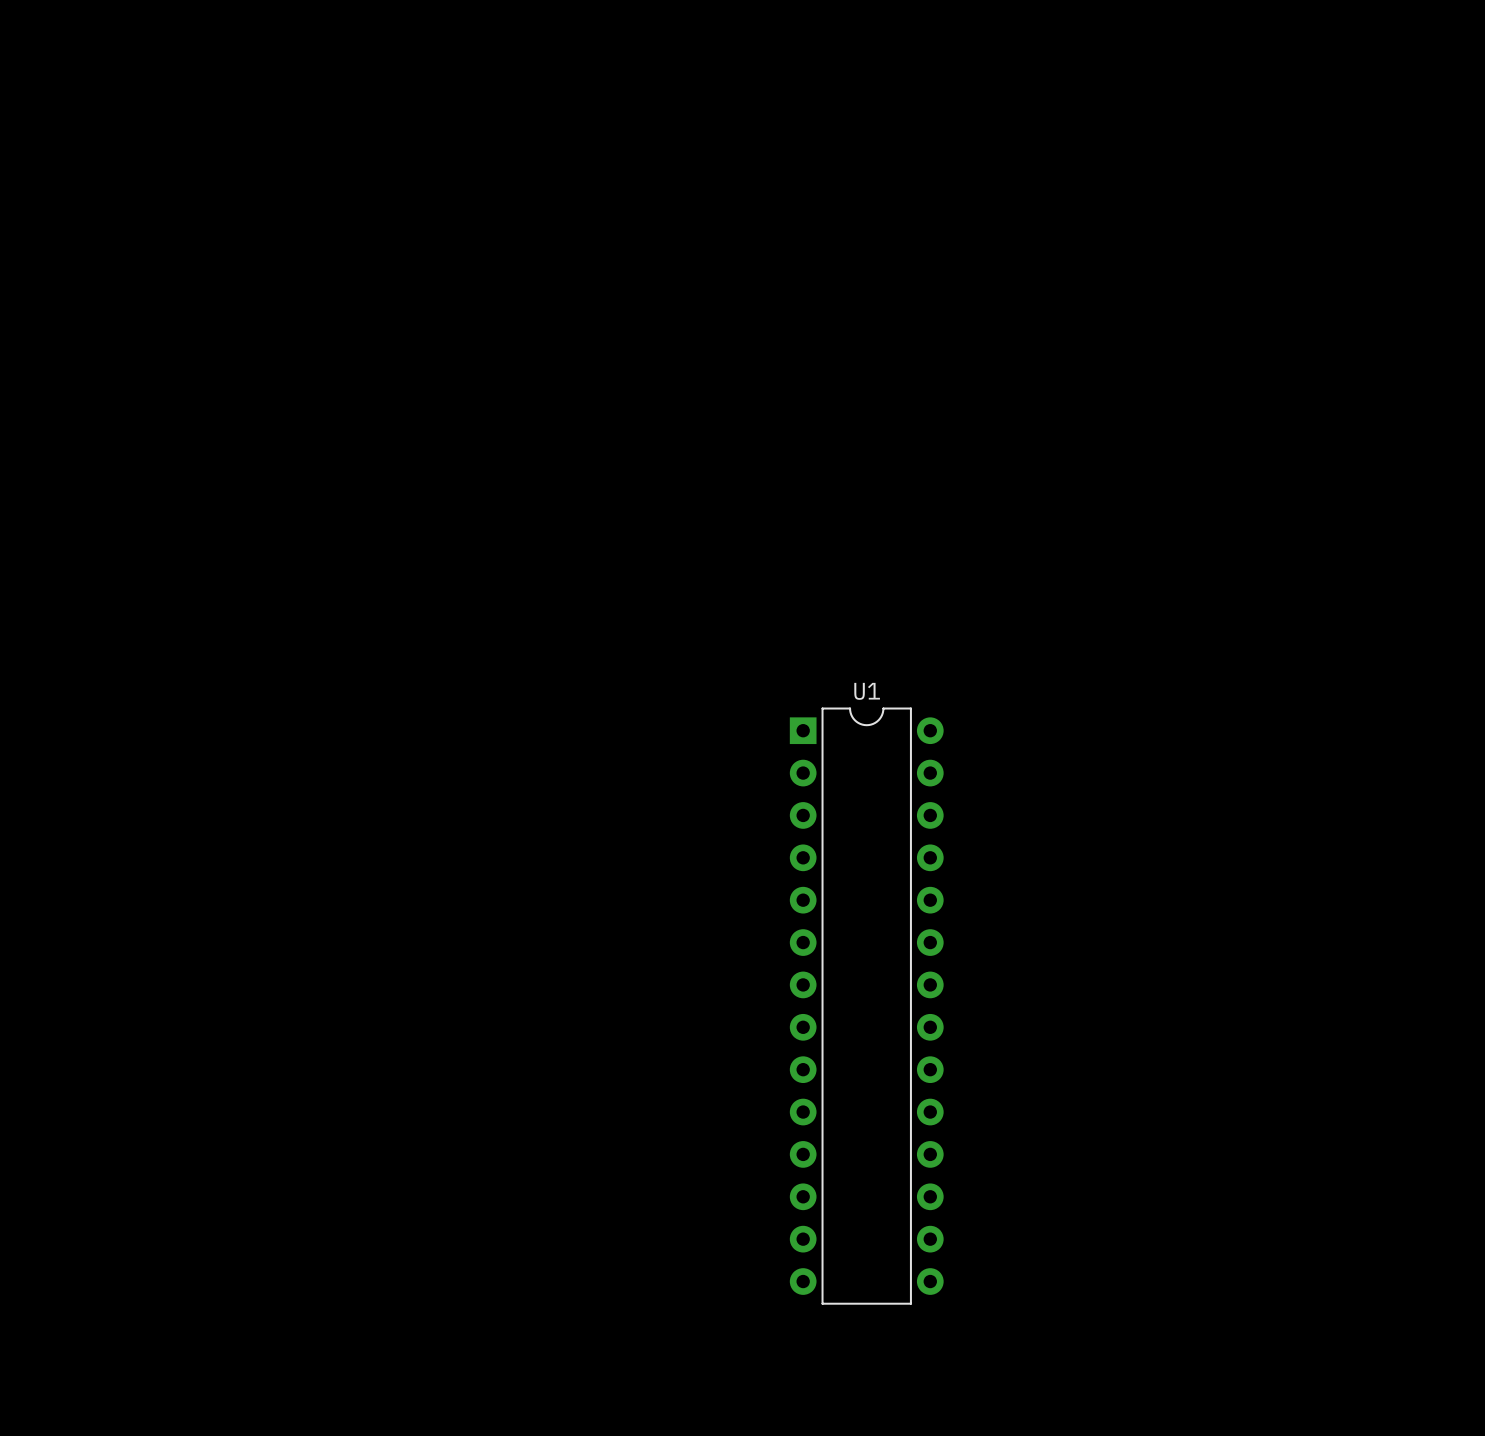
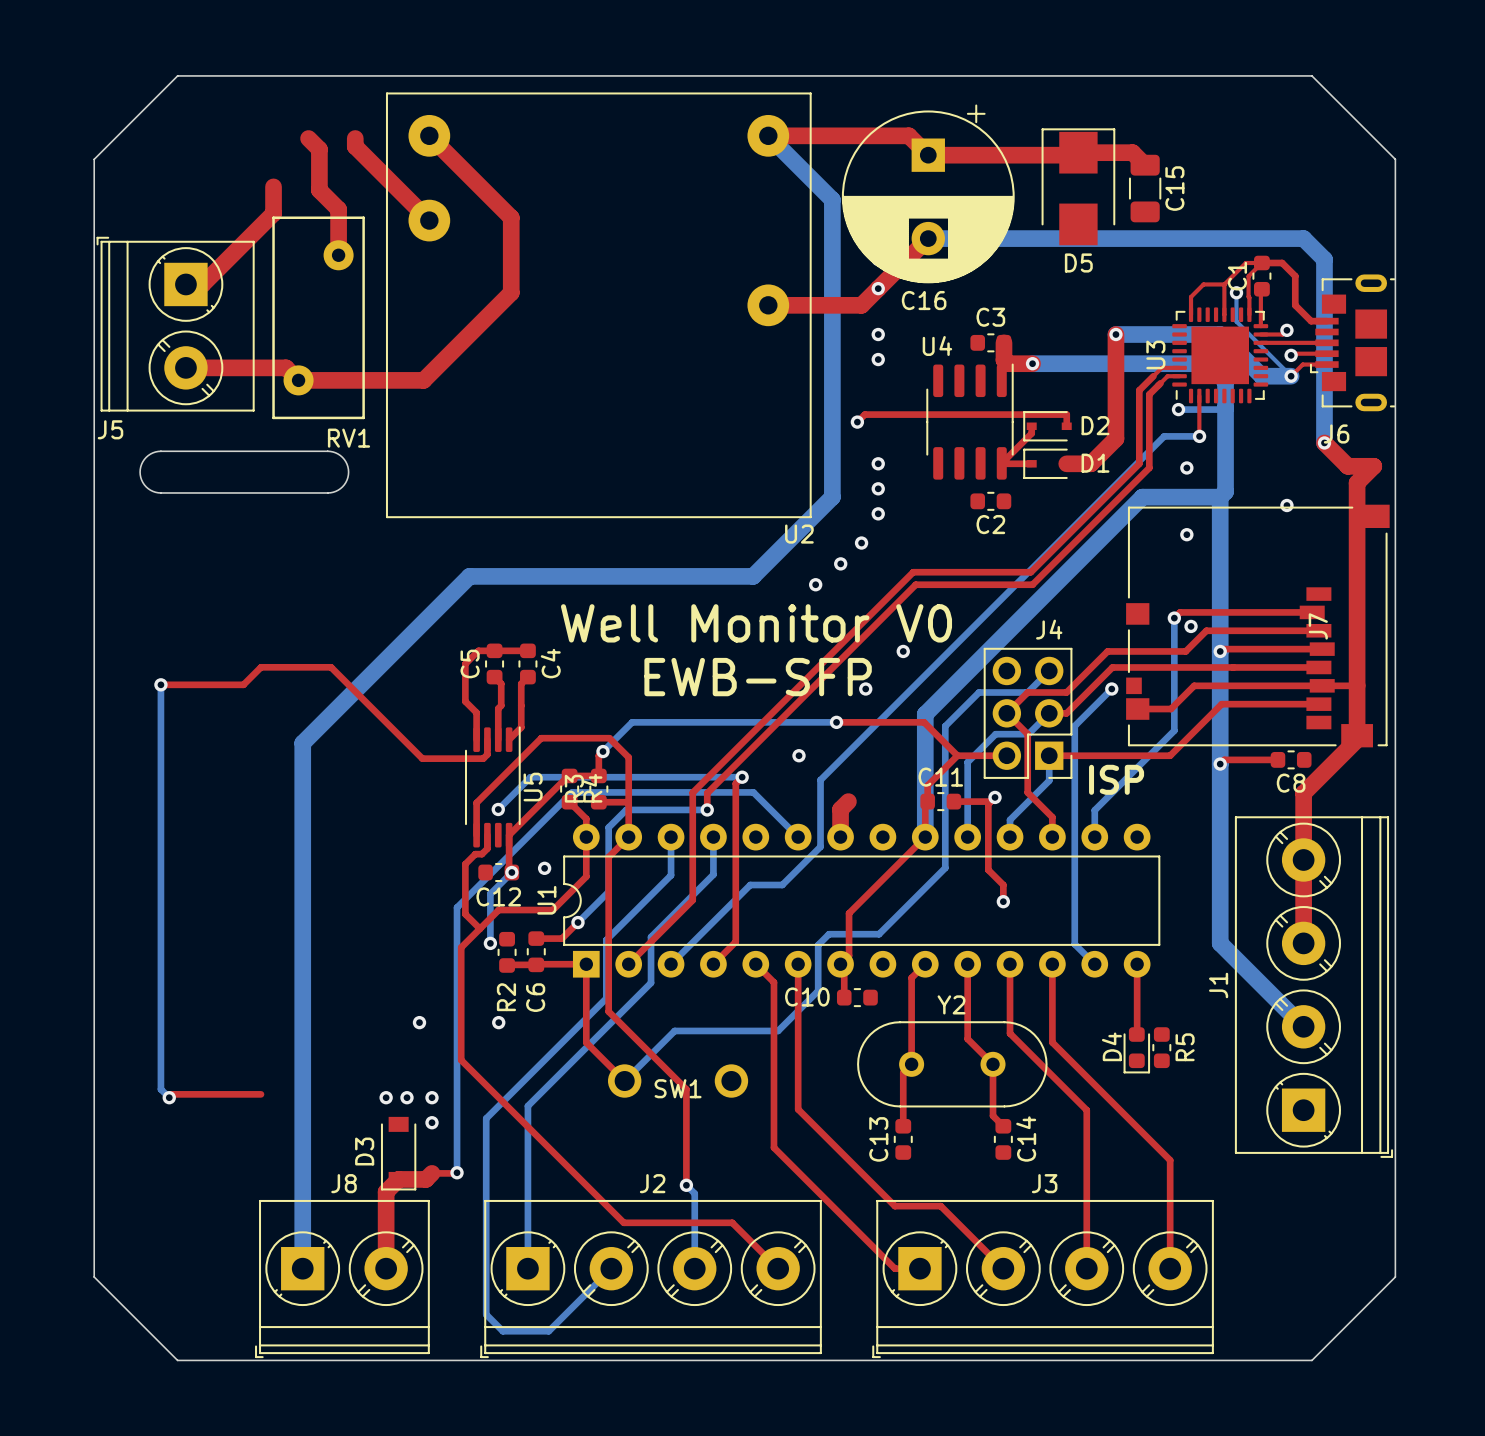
board edge: none -> (177, 75) (1311, 75) (1395, 159) (1395, 1277) (1311, 1360) (177, 1360) (94, 1277) (94, 159) (177, 75)
top track: none -> (429, 135) (511, 217) (511, 292) (423, 380) (298, 380) (286, 367) (185, 367)
top track: none -> (768, 135) (908, 135) (928, 155) (1075, 155) (1078, 152) (1132, 152) (1145, 165)
bottom track: none -> (768, 135) (832, 199) (832, 497) (753, 576) (469, 576) (302, 743) (302, 1268)
top track: none -> (308, 138) (319, 149) (319, 190) (338, 209) (338, 255)
top track: none -> (355, 138) (355, 146) (429, 220)
top track: none -> (273, 186) (273, 213) (202, 284) (185, 284)
D5: none -> (1078, 186)
C15: none -> (1145, 188)
C16: none -> (928, 193)
top track: none -> (928, 238) (861, 305) (768, 305)
bottom track: none -> (928, 238) (1303, 238) (1324, 259) (1324, 442)
top track: none -> (1261, 262) (1248, 276) (1249, 314)
top track: none -> (1261, 262) (1245, 262) (1224, 284)
top track: none -> (1261, 262) (1282, 262) (1295, 276) (1295, 305) (1311, 321) (1326, 321)
C1: none -> (1261, 276)
top track: none -> (1224, 284) (1224, 314)
top track: none -> (1224, 284) (1203, 284) (1191, 296) (1191, 314)
top track: none -> (1262, 284) (1260, 286) (1260, 326)
via: none -> (878, 288)
bottom track: none -> (1236, 292) (1236, 321) (1291, 376) (1261, 376) (1220, 334) (1115, 334)
via: none -> (1236, 292)
U2: none -> (598, 305)
RV1: none -> (318, 317)
J5: none -> (175, 324)
top track: none -> (1286, 330) (1282, 334) (1260, 334)
via: none -> (1286, 330)
via: none -> (878, 334)
top track: none -> (1115, 334) (1115, 438) (1090, 463) (1066, 463)
via: none -> (1115, 334)
C3: none -> (990, 342)
top track: none -> (1260, 342) (1326, 342)
J6: none -> (1352, 342)
top track: none -> (1326, 353) (1292, 353) (1291, 355)
U3: none -> (1220, 355)
via: none -> (1291, 355)
via: none -> (878, 359)
top track: none -> (1032, 363) (1007, 363) (1003, 360) (1003, 342) (1001, 345) (1001, 380)
bottom track: none -> (1032, 363) (1207, 363) (1225, 381) (1225, 491) (1220, 497)
via: none -> (1032, 363)
top track: none -> (1326, 364) (1302, 364) (1291, 376)
top track: none -> (1179, 367) (1161, 367) (1139, 390) (1139, 463) (1030, 572) (913, 572) (692, 792) (692, 900) (628, 964)
top track: none -> (1179, 376) (1167, 376) (1158, 385)
via: none -> (1291, 376)
top track: none -> (1160, 383) (1149, 394) (1149, 467) (1032, 584) (915, 584) (707, 793) (707, 809)
top track: none -> (1199, 396) (1199, 436)
bottom track: none -> (1225, 408) (1178, 409)
via: none -> (1178, 409)
U4: none -> (969, 421)
top track: none -> (857, 422) (864, 414) (1066, 414) (1066, 426)
via: none -> (857, 422)
top track: none -> (1031, 426) (1031, 433) (1001, 463) (1031, 463)
D2: none -> (1047, 426)
bottom track: none -> (1199, 436) (1164, 436) (820, 780) (820, 846) (782, 885) (750, 885) (671, 964)
via: none -> (1199, 436)
top track: none -> (1324, 442) (1347, 466) (1373, 466) (1357, 482) (1357, 739) (1303, 793) (1303, 943)
via: none -> (1324, 442)
board edge: none -> (160, 451) (330, 451) (338, 454) (344, 459) (347, 466) (348, 474) (342, 486) (330, 492) (158, 492) (150, 490) (144, 484) (140, 477) (140, 469) (146, 457) (152, 452) (160, 451)
via: none -> (878, 463)
D1: none -> (1047, 463)
via: none -> (1186, 467)
via: none -> (878, 488)
bottom track: none -> (1220, 497) (1142, 497) (925, 714) (925, 837)
bottom track: none -> (1220, 497) (1220, 943) (1303, 1026)
C2: none -> (990, 501)
via: none -> (1286, 505)
via: none -> (878, 513)
via: none -> (1186, 534)
via: none -> (861, 543)
via: none -> (840, 563)
via: none -> (815, 584)
top track: none -> (1312, 612) (1180, 612) (1174, 618)
bottom track: none -> (1174, 618) (1174, 730) (1094, 810) (1094, 837)
via: none -> (1174, 618)
text: none -> Well Monitor V0 (756, 623)
via: none -> (1191, 626)
J7: none -> (1257, 626)
top track: none -> (1318, 630) (1206, 630) (1185, 651) (1107, 651) (1066, 692) (1027, 692) (1006, 713) (1027, 734) (1027, 792) (1052, 817) (1052, 837)
top track: none -> (1322, 649) (1222, 649) (1220, 651)
top track: none -> (527, 650) (478, 650) (465, 663) (465, 701) (476, 712) (476, 739)
via: none -> (903, 651)
via: none -> (1220, 651)
C5: none -> (494, 663)
C4: none -> (527, 663)
top track: none -> (1318, 667) (1112, 667) (1066, 713) (1049, 713)
bottom track: none -> (1049, 670) (1027, 693) (979, 692) (945, 726) (945, 867) (879, 934) (829, 934) (818, 945) (818, 990) (778, 1030) (674, 1030) (624, 1081)
top track: none -> (494, 677) (501, 683) (501, 705) (498, 708) (498, 739)
top track: none -> (527, 677) (521, 683) (521, 727) (509, 739)
text: none -> EWB-SFP (758, 677)
top track: none -> (160, 684) (243, 684) (261, 667) (331, 667) (422, 758) (483, 758) (487, 754) (487, 739)
bottom track: none -> (160, 684) (160, 1089) (169, 1097)
via: none -> (160, 684)
top track: none -> (1356, 685) (1194, 685) (1171, 709) (1137, 709)
via: none -> (865, 689)
bottom track: none -> (1111, 689) (1074, 726) (1074, 944) (1094, 964)
via: none -> (1111, 689)
top track: none -> (1318, 704) (1221, 704) (1170, 755) (1049, 755)
J4: none -> (1028, 713)
bottom track: none -> (1049, 713) (1028, 734) (995, 734) (967, 762) (967, 837)
top track: none -> (836, 722) (924, 722) (957, 755)
bottom track: none -> (836, 722) (632, 722) (603, 751)
via: none -> (836, 722)
top track: none -> (603, 751) (598, 755) (598, 775) (568, 775) (509, 835) (509, 869) (511, 872)
via: none -> (603, 751)
via: none -> (799, 755)
top track: none -> (957, 755) (1006, 755)
top track: none -> (957, 755) (927, 785) (927, 801) (925, 803) (925, 837) (849, 913) (849, 955) (840, 964) (844, 967) (844, 997)
bottom track: none -> (1049, 755) (1049, 780) (1010, 819) (1010, 837)
top track: none -> (1277, 759) (1224, 759) (1220, 764)
C8: none -> (1291, 759)
via: none -> (1220, 764)
top track: none -> (742, 777) (735, 783) (735, 941) (713, 964)
bottom track: none -> (742, 777) (530, 777) (498, 809)
via: none -> (742, 777)
text: none -> ISP (1116, 779)
U5: none -> (492, 786)
R4: none -> (569, 789)
R3: none -> (598, 789)
top track: none -> (995, 797) (988, 804) (988, 869) (1003, 885) (1003, 901)
via: none -> (995, 797)
top track: none -> (848, 801) (840, 809) (840, 837)
C11: none -> (940, 801)
top track: none -> (953, 801) (990, 801)
top track: none -> (569, 802) (586, 818) (586, 876) (552, 910) (498, 910) (461, 947) (461, 1060) (623, 1222) (732, 1222) (778, 1268)
top track: none -> (598, 802) (628, 802)
via: none -> (498, 809)
bottom track: none -> (707, 809) (626, 809) (608, 827) (608, 891) (577, 922)
via: none -> (707, 809)
top track: none -> (476, 835) (476, 802) (541, 738) (609, 738) (628, 757) (628, 837) (608, 857) (608, 1011) (686, 1089) (686, 1185)
top track: none -> (487, 835) (487, 848) (481, 854) (475, 854) (465, 864) (465, 914) (479, 928)
bottom track: none -> (671, 837) (671, 875) (606, 940) (606, 998) (486, 1118) (486, 1314) (502, 1331) (548, 1331) (611, 1268)
bottom track: none -> (713, 837) (713, 874) (651, 937) (651, 982) (527, 1106) (527, 1268)
bottom track: none -> (798, 837) (753, 792) (572, 792) (457, 907) (457, 1172)
via: none -> (544, 868)
C12: none -> (498, 872)
bottom track: none -> (511, 872) (490, 893) (490, 943)
via: none -> (511, 872)
via: none -> (1003, 901)
top track: none -> (577, 922) (561, 938) (536, 938)
via: none -> (577, 922)
via: none -> (490, 943)
C6: none -> (536, 951)
R2: none -> (507, 952)
top track: none -> (755, 964) (773, 982) (773, 1147) (894, 1268) (919, 1268)
top track: none -> (798, 964) (798, 1109) (894, 1206) (940, 1206) (1003, 1268)
top track: none -> (925, 964) (911, 977) (911, 1064) (903, 1072) (903, 1126)
top track: none -> (967, 964) (967, 1038) (993, 1064) (993, 1115) (1003, 1126)
top track: none -> (1010, 964) (1010, 1033) (1086, 1110) (1086, 1268)
top track: none -> (1052, 964) (1052, 1042) (1170, 1160) (1170, 1268)
top track: none -> (1137, 964) (1136, 1034)
top track: none -> (507, 965) (586, 964) (586, 1042) (624, 1081)
J1: none -> (1313, 987)
C10: none -> (857, 997)
U1 rotation: 0° (866, 1006) -> 90° counterclockwise (861, 900)
via: none -> (419, 1022)
via: none -> (498, 1022)
R5: none -> (1161, 1047)
D4: none -> (1136, 1050)
Y2: none -> (952, 1064)
SW1: none -> (678, 1081)
top track: none -> (261, 1094) (172, 1094) (169, 1097)
via: none -> (169, 1097)
via: none -> (386, 1097)
via: none -> (406, 1097)
via: none -> (432, 1097)
via: none -> (432, 1122)
C13: none -> (903, 1139)
C14: none -> (1003, 1139)
D3: none -> (398, 1153)
top track: none -> (457, 1172) (432, 1173) (425, 1179) (398, 1179) (386, 1191) (386, 1268)
via: none -> (457, 1172)
bottom track: none -> (686, 1185) (694, 1193) (694, 1268)
via: none -> (686, 1185)
J8: none -> (342, 1279)
J2: none -> (651, 1279)
J3: none -> (1043, 1279)

